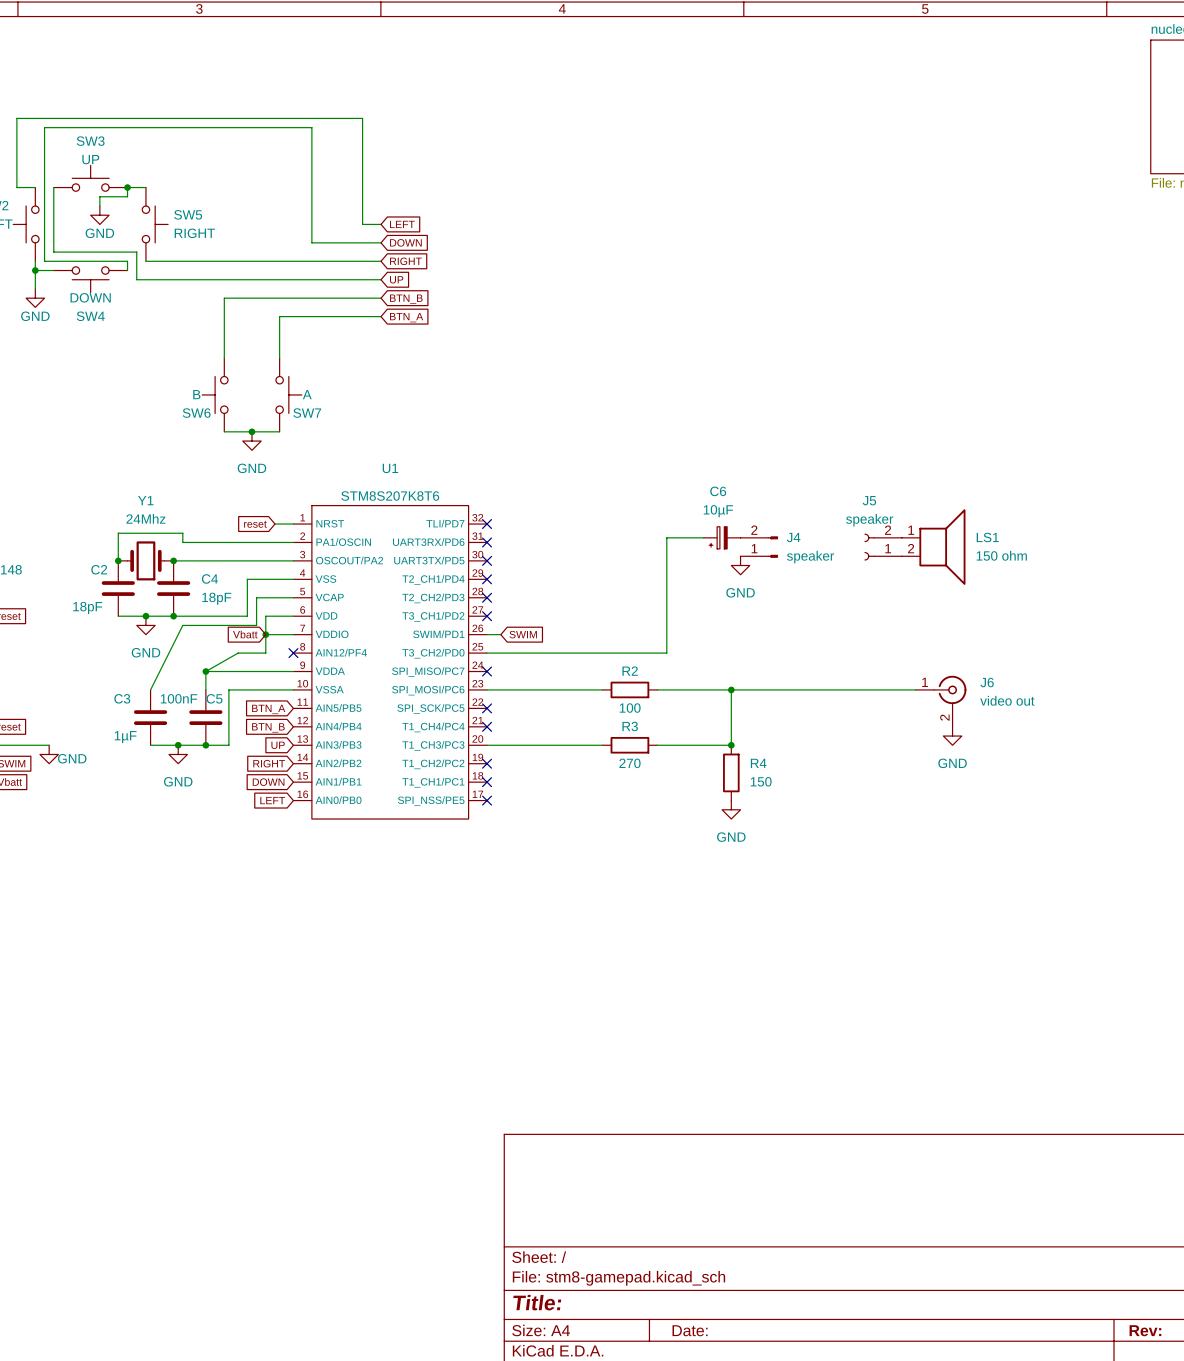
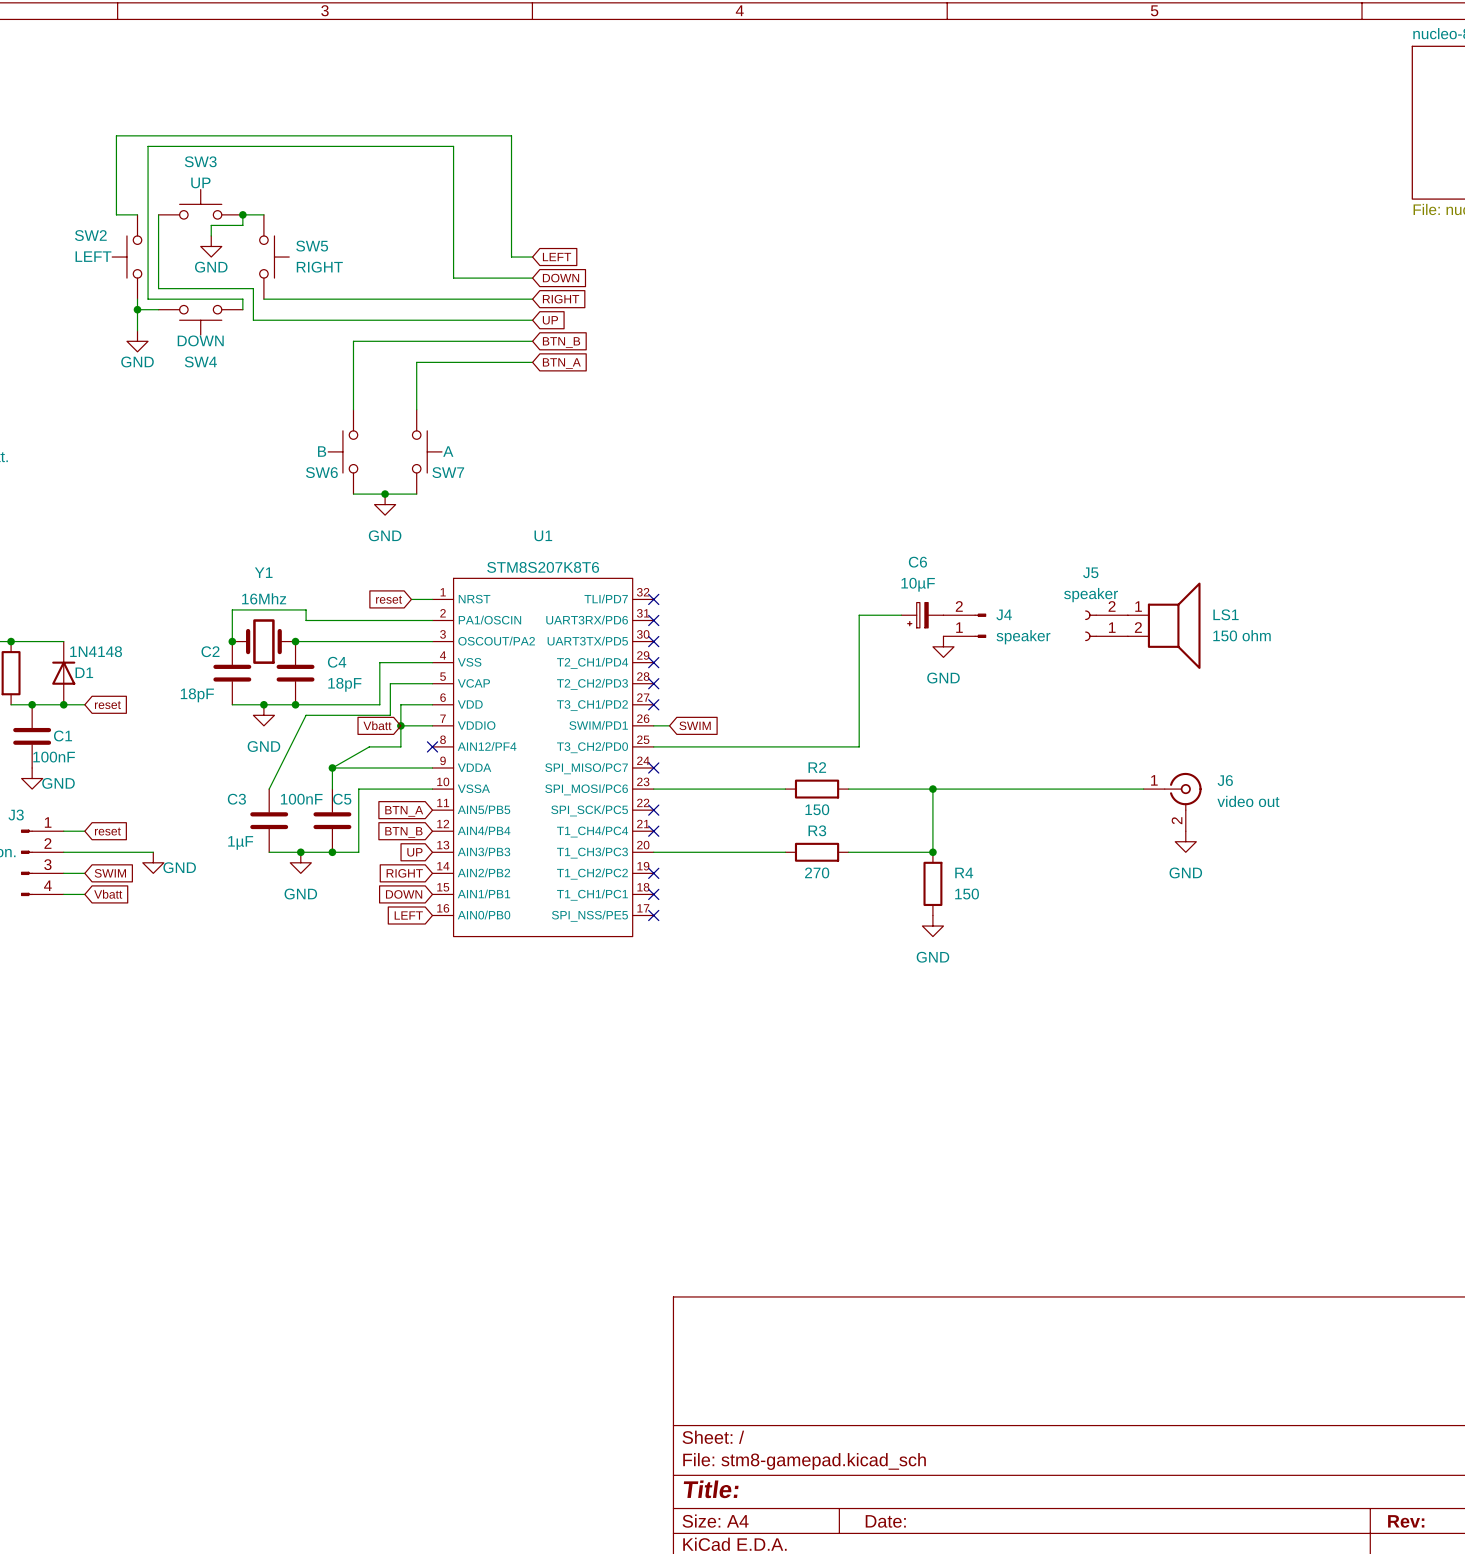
Y1 value: 24Mhz (145, 518) -> 16Mhz (264, 598)
R2 value: 100 (630, 708) -> 150 (817, 809)

